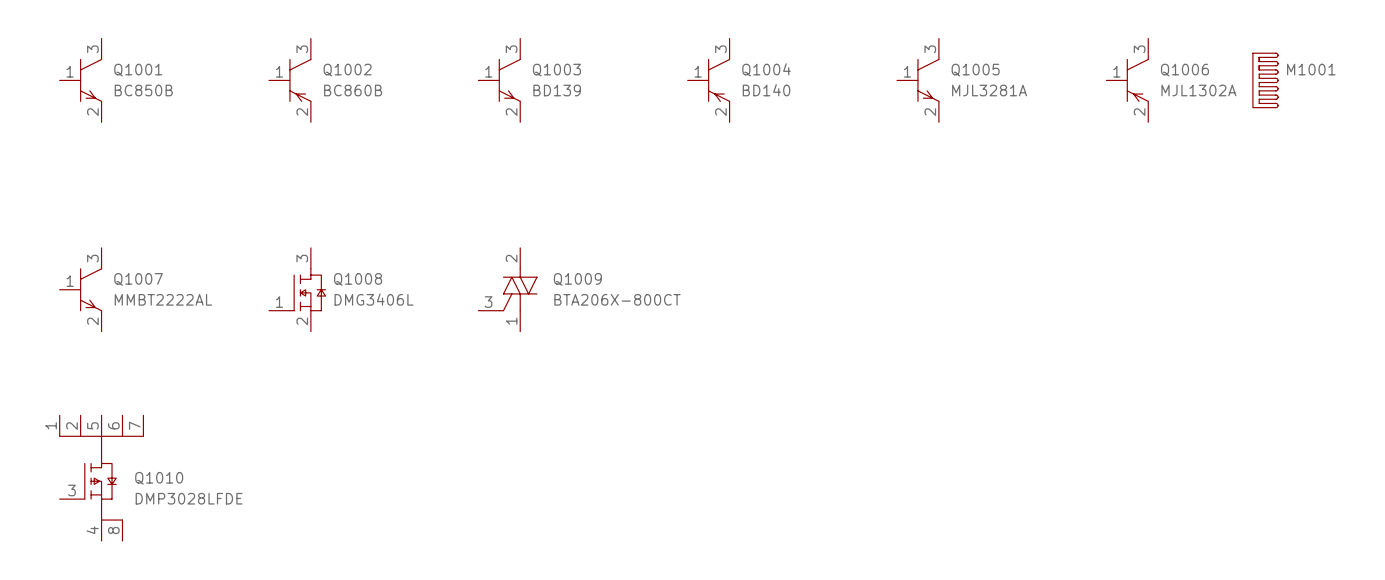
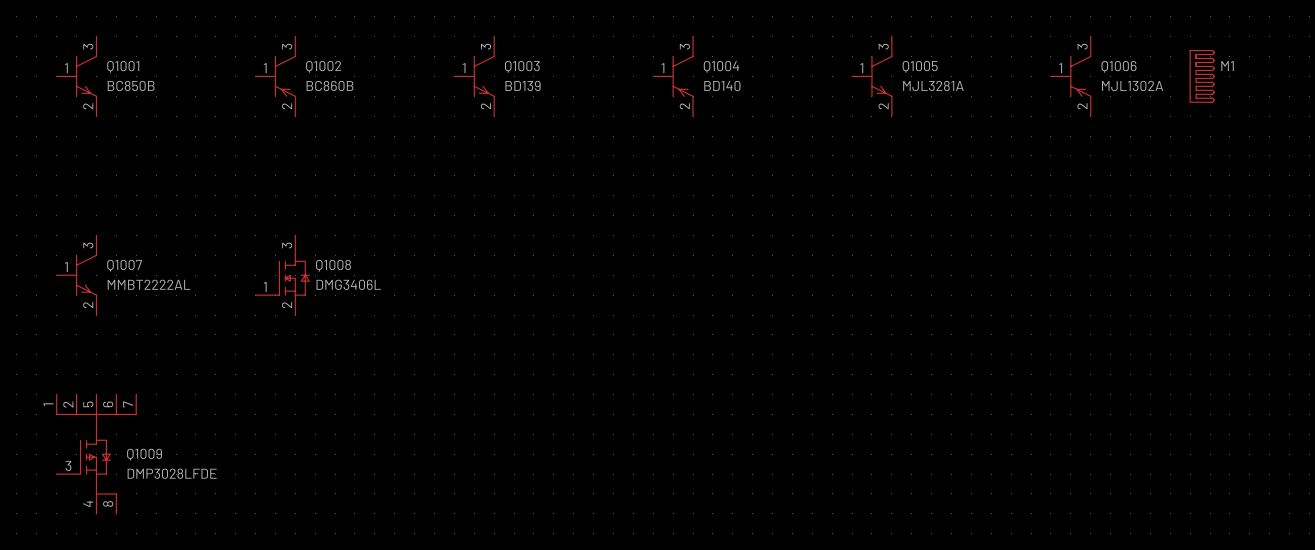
M1001 name: M1001 (1311, 69) -> M1 (1227, 66)
Q1009: BTA206X-800CT (507, 289) -> none
Q1010 name: Q1010 (159, 478) -> Q1009 (144, 454)

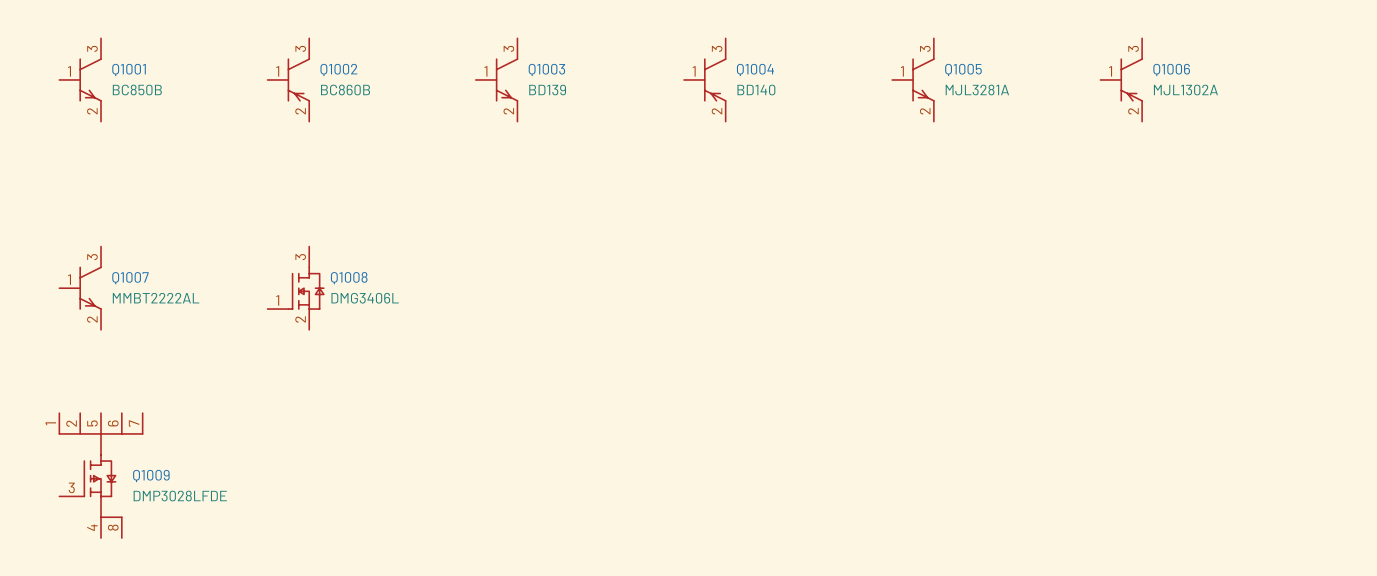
M1: (1202, 76) -> none

